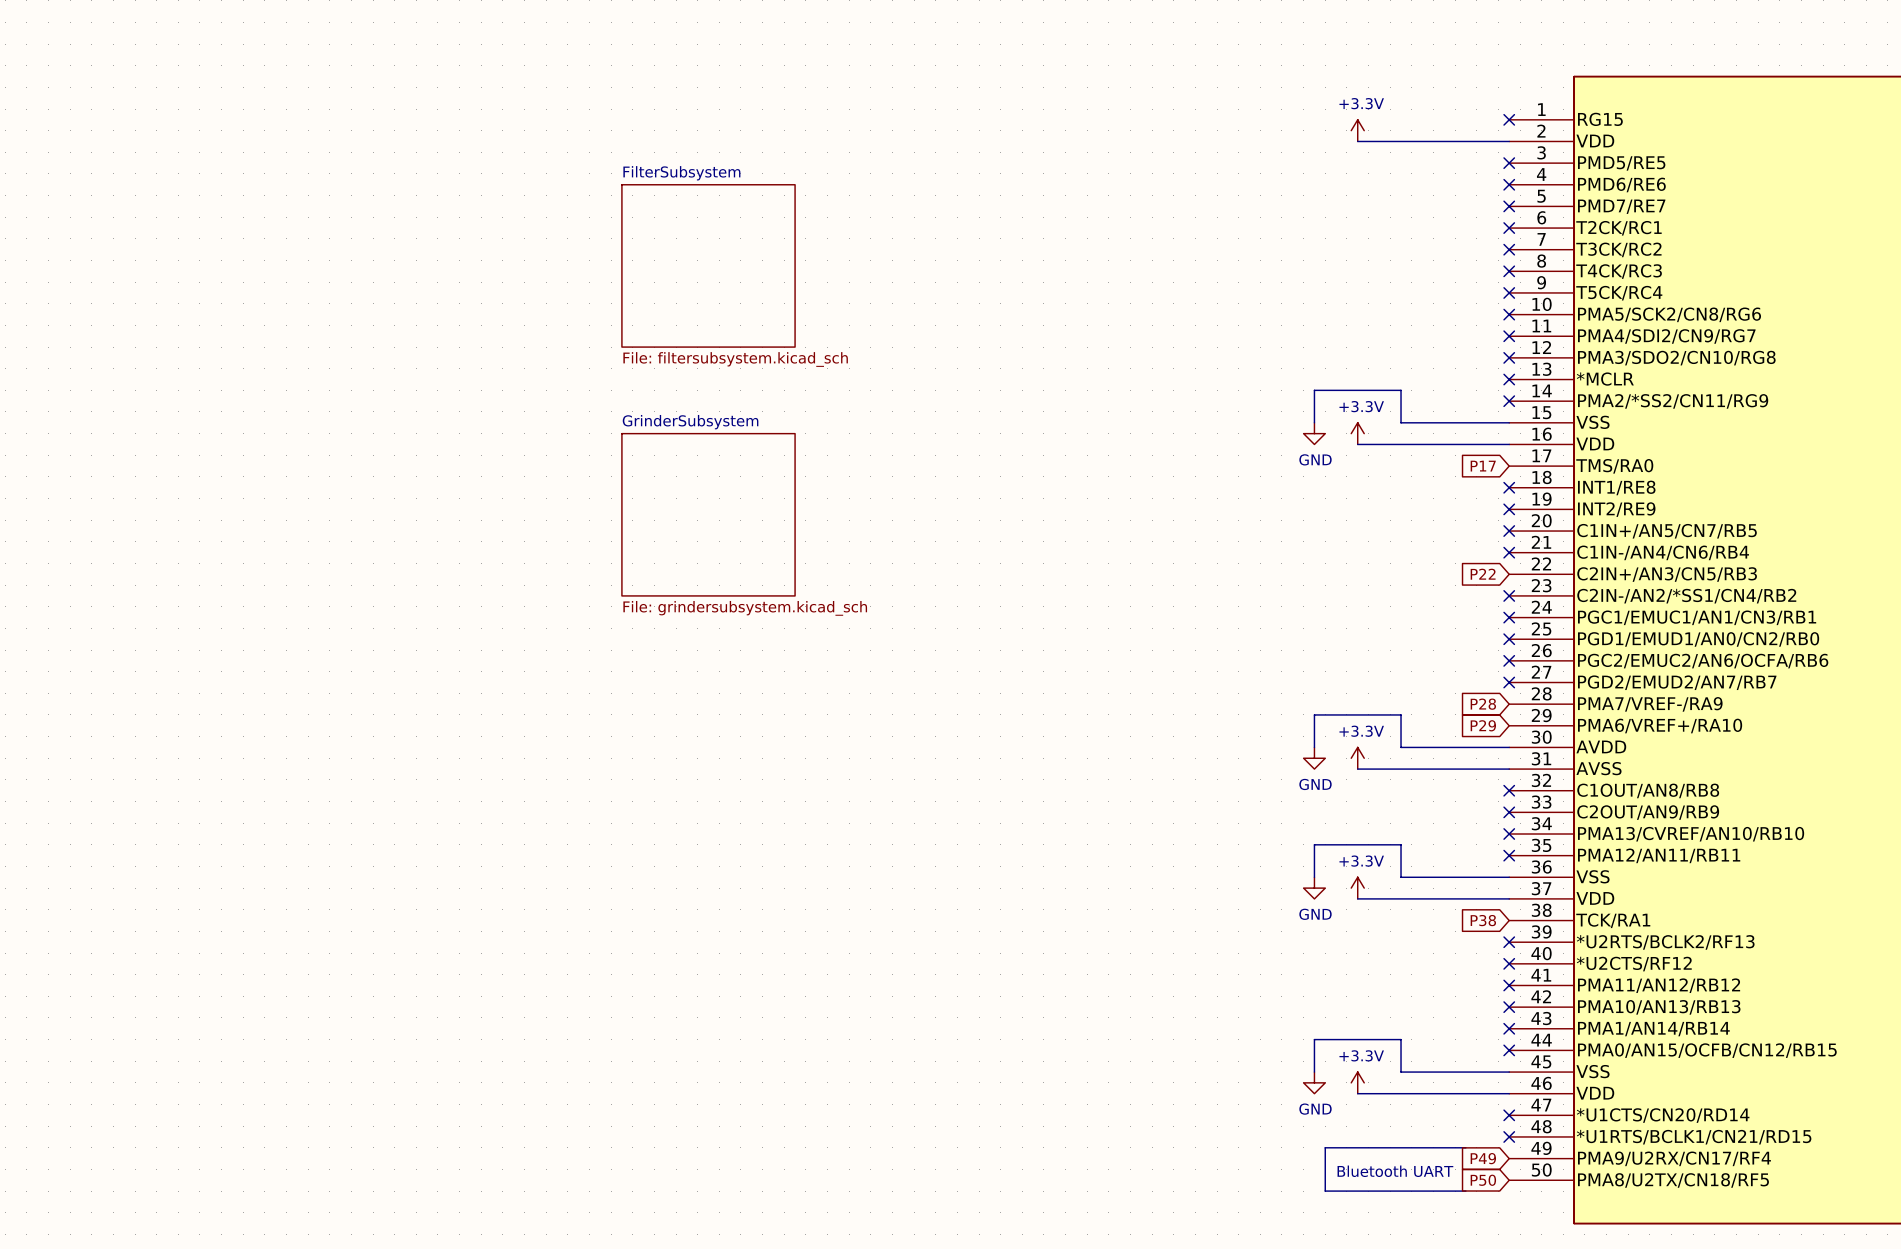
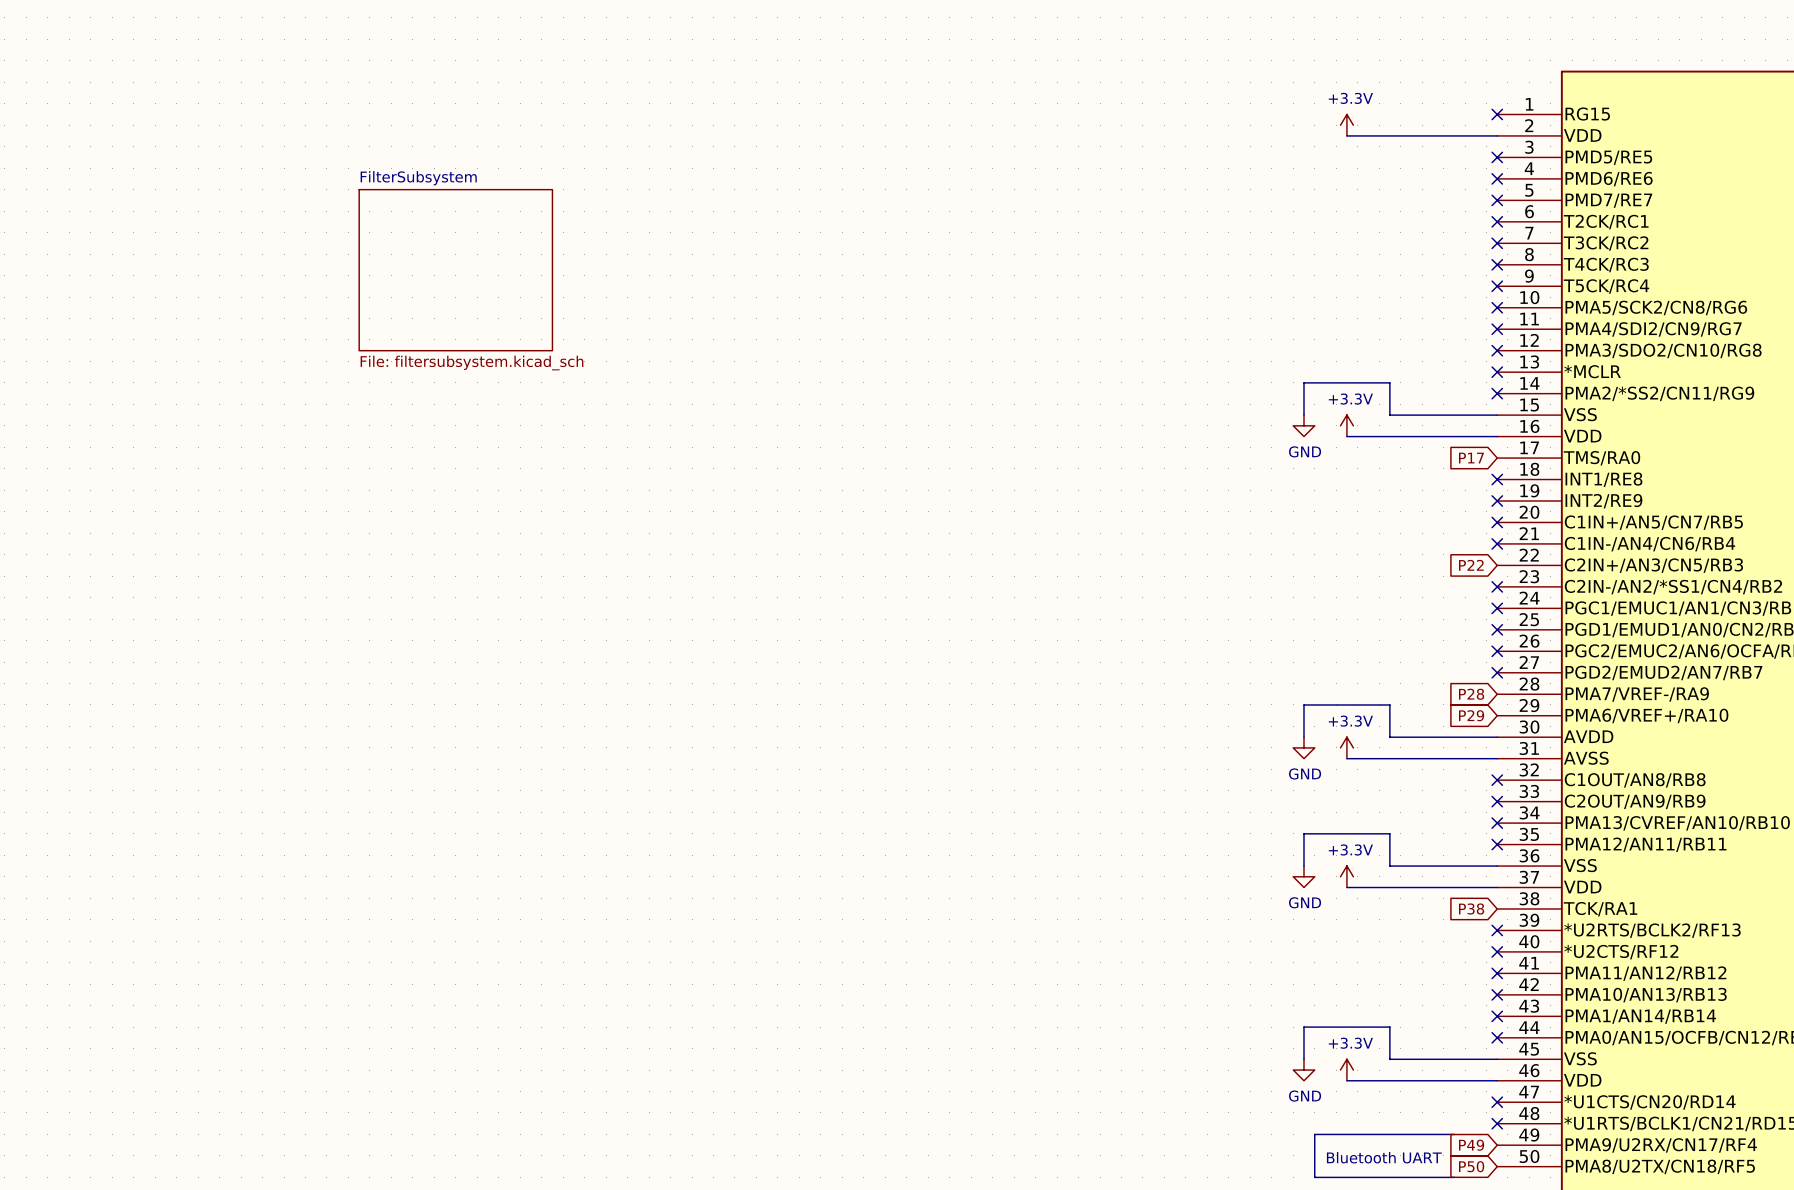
sheet FilterSubsystem: File: filtersubsystem.kicad_sch (708, 265) -> none
sheet FilterSubsystem: none -> File: filtersubsystem.kicad_sch (455, 270)
sheet GrinderSubsystem: File: grindersubsystem.kicad_sch (708, 514) -> none

